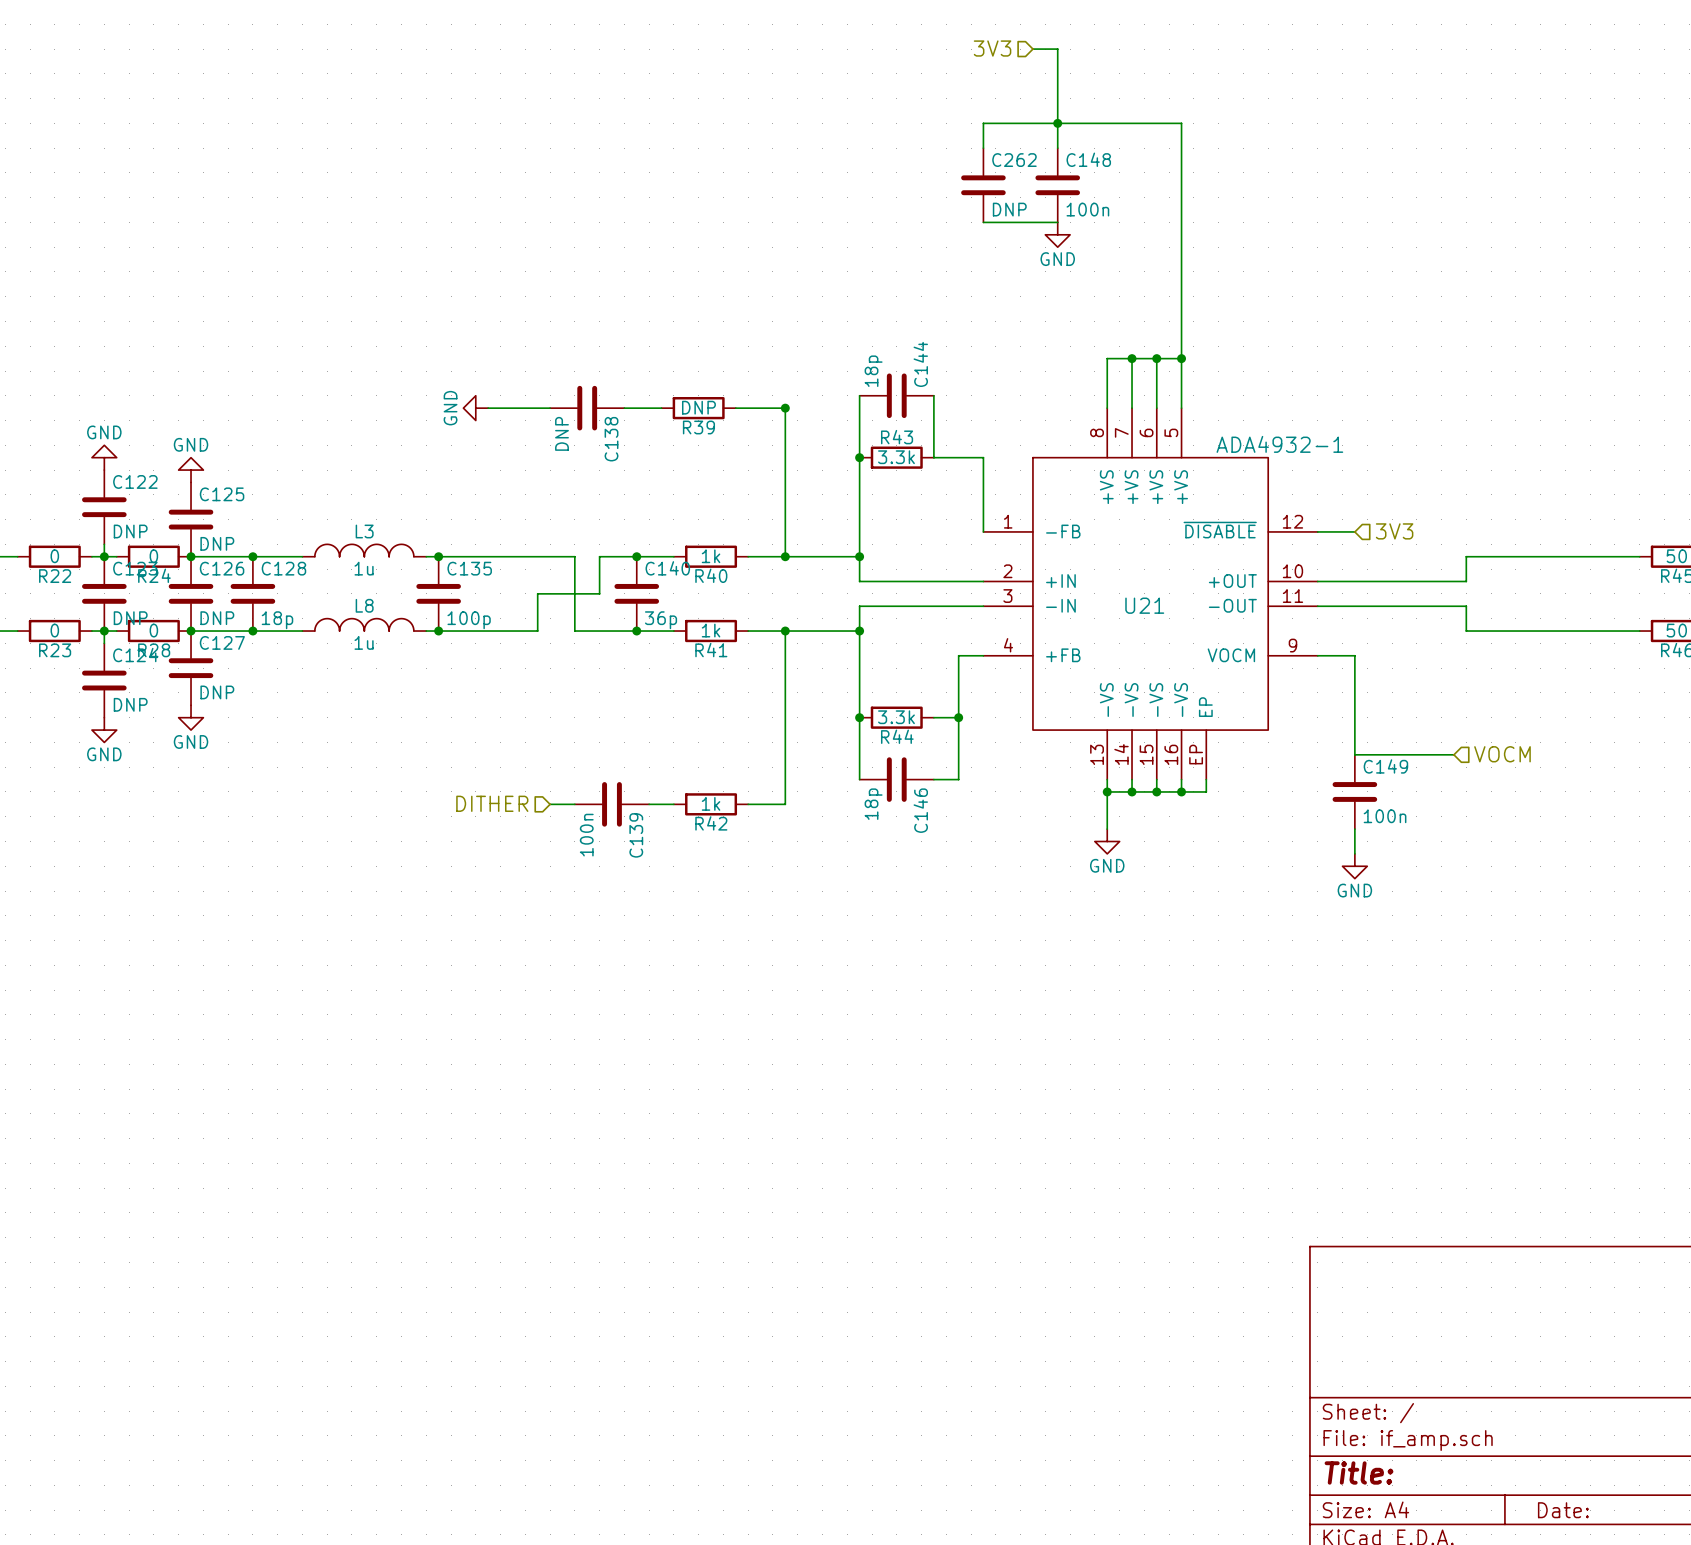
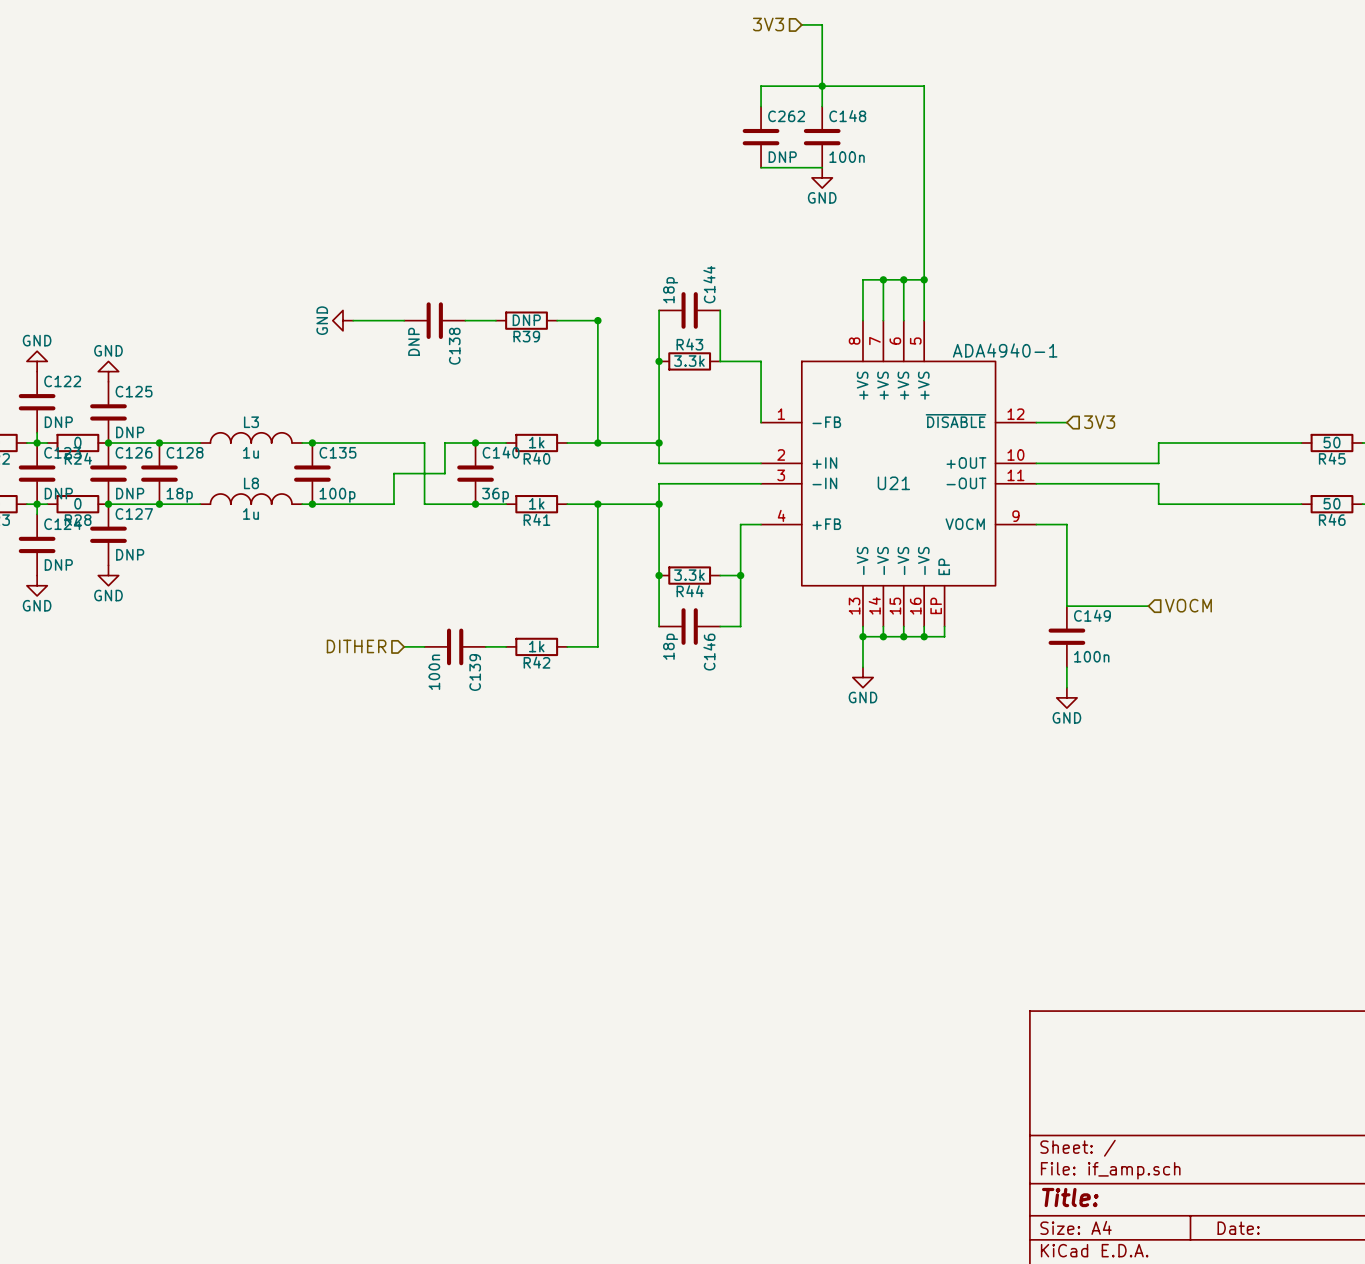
U21 value: ADA4932-1 (1279, 444) -> ADA4940-1 (1005, 350)

